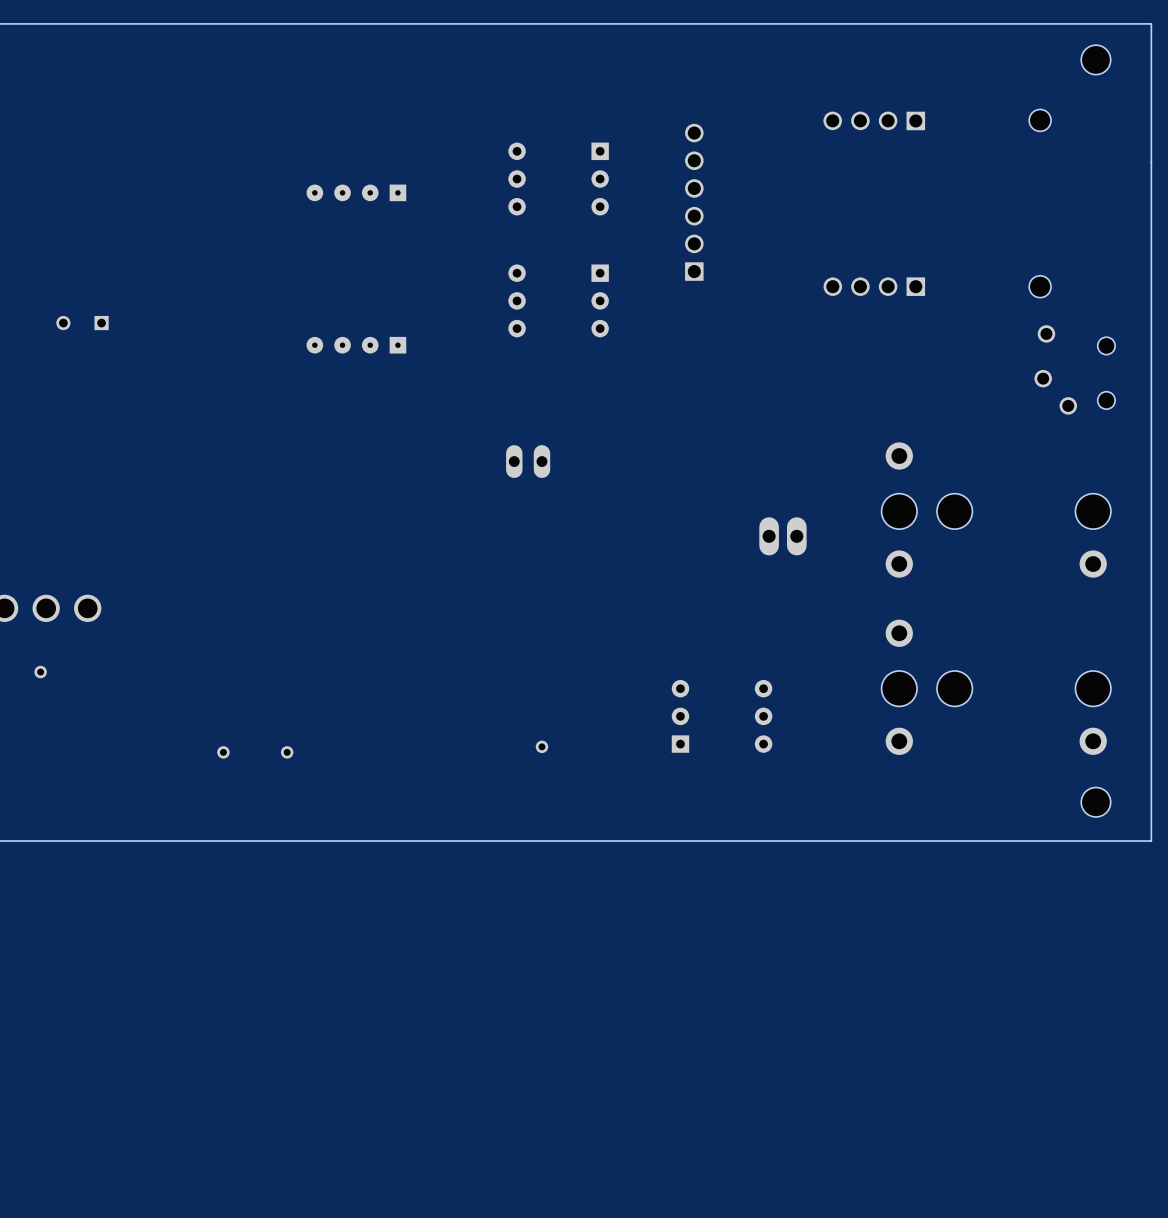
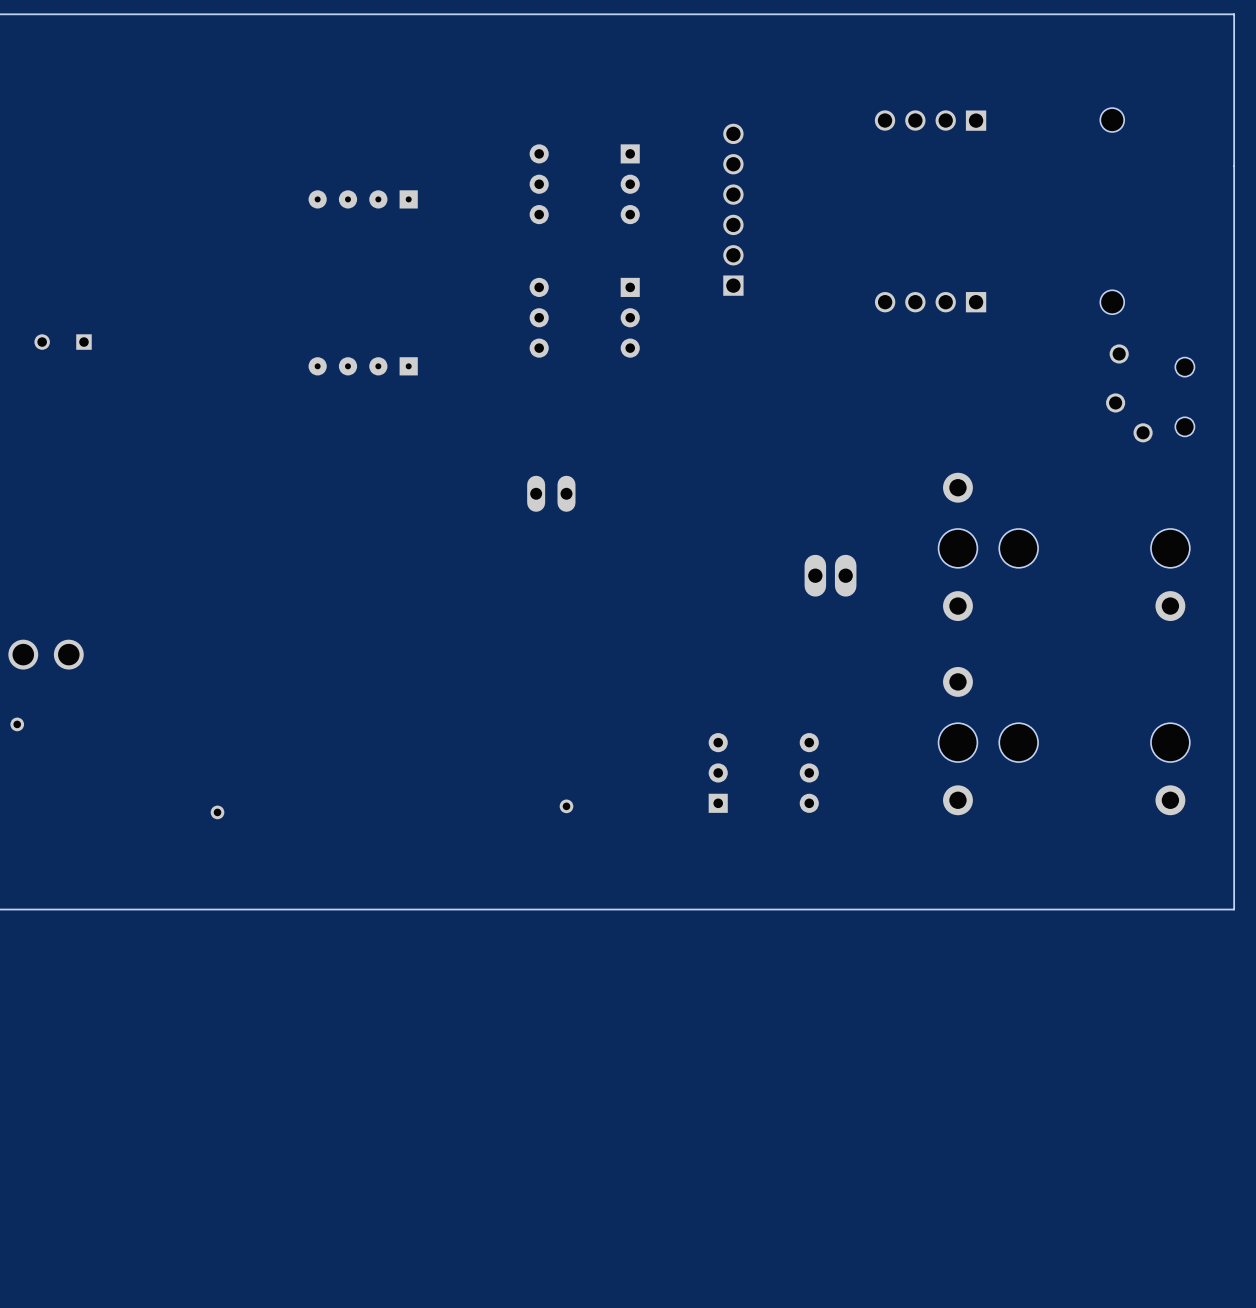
part: (1095, 59) -> none
part: (287, 752) -> none
part: (1095, 802) -> none

